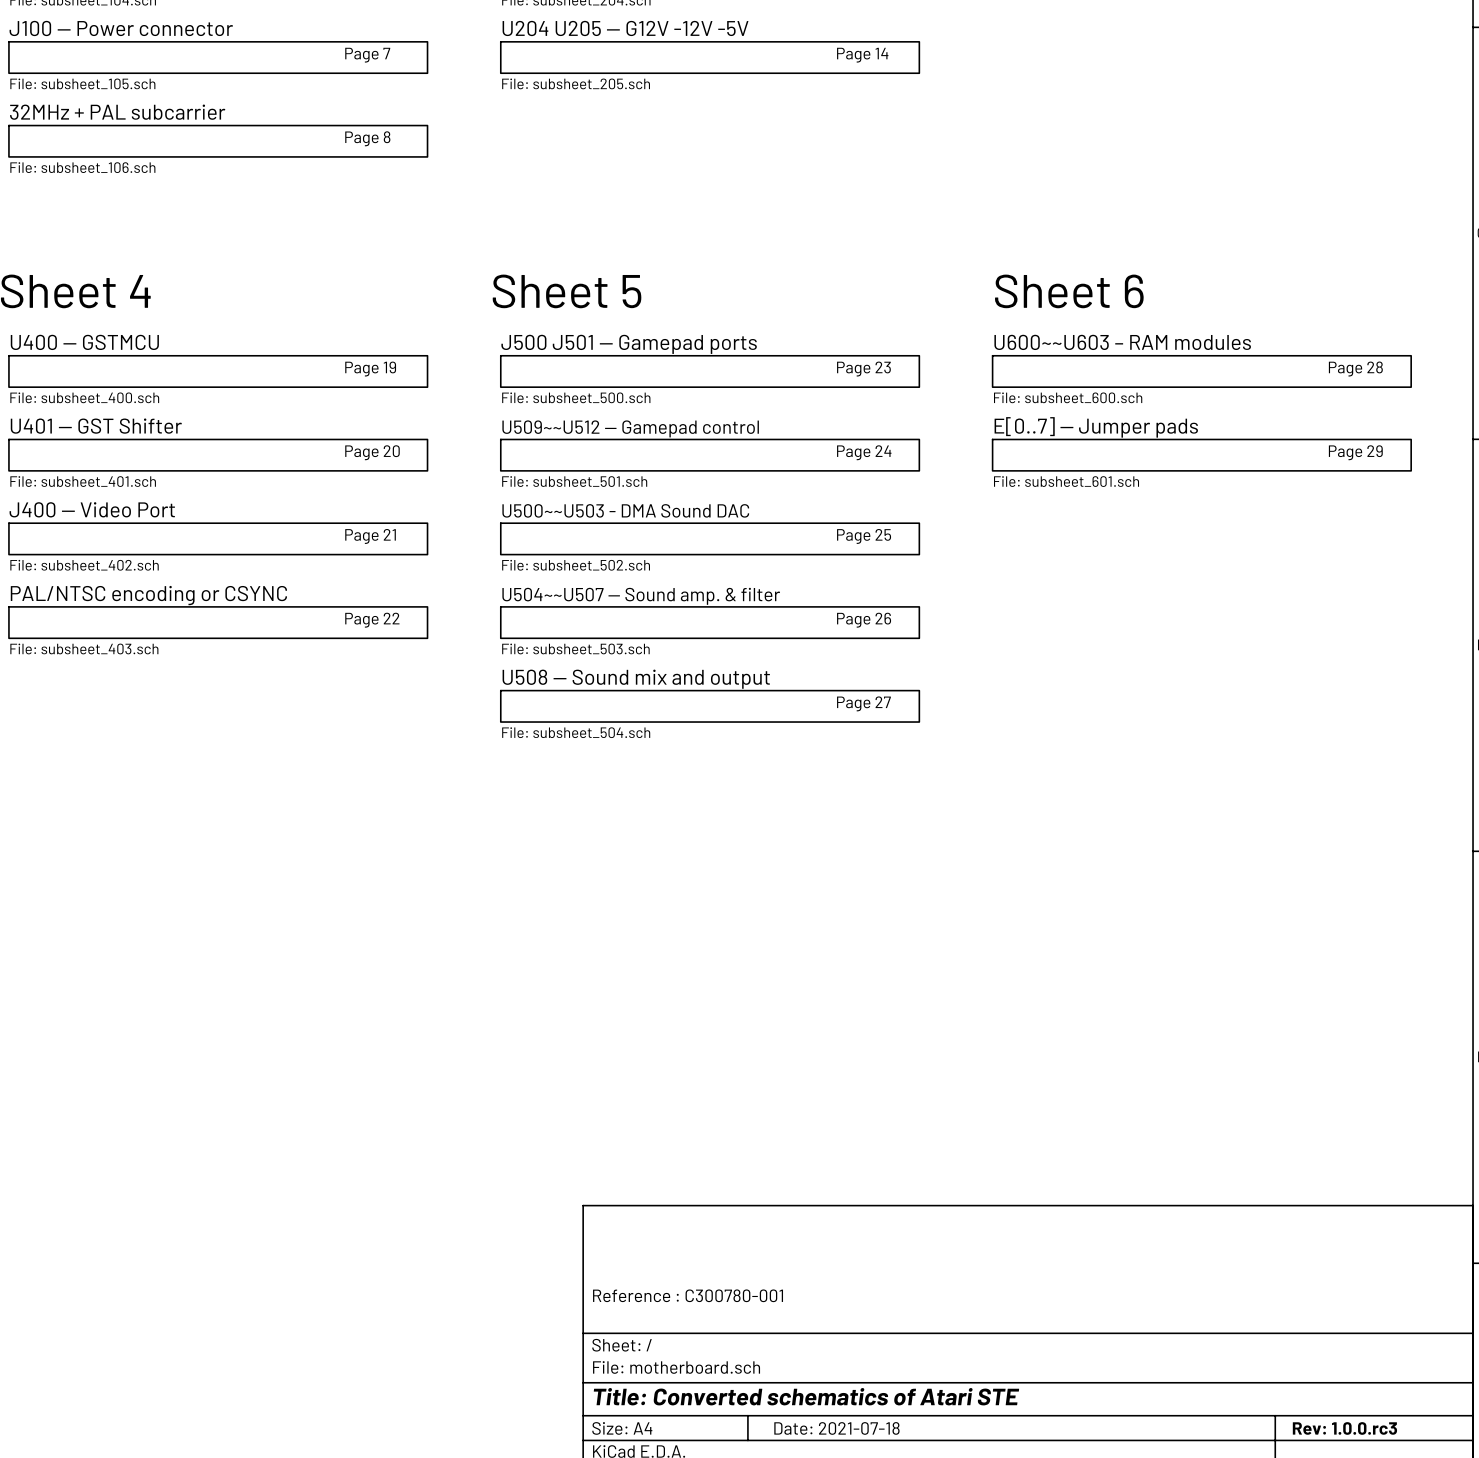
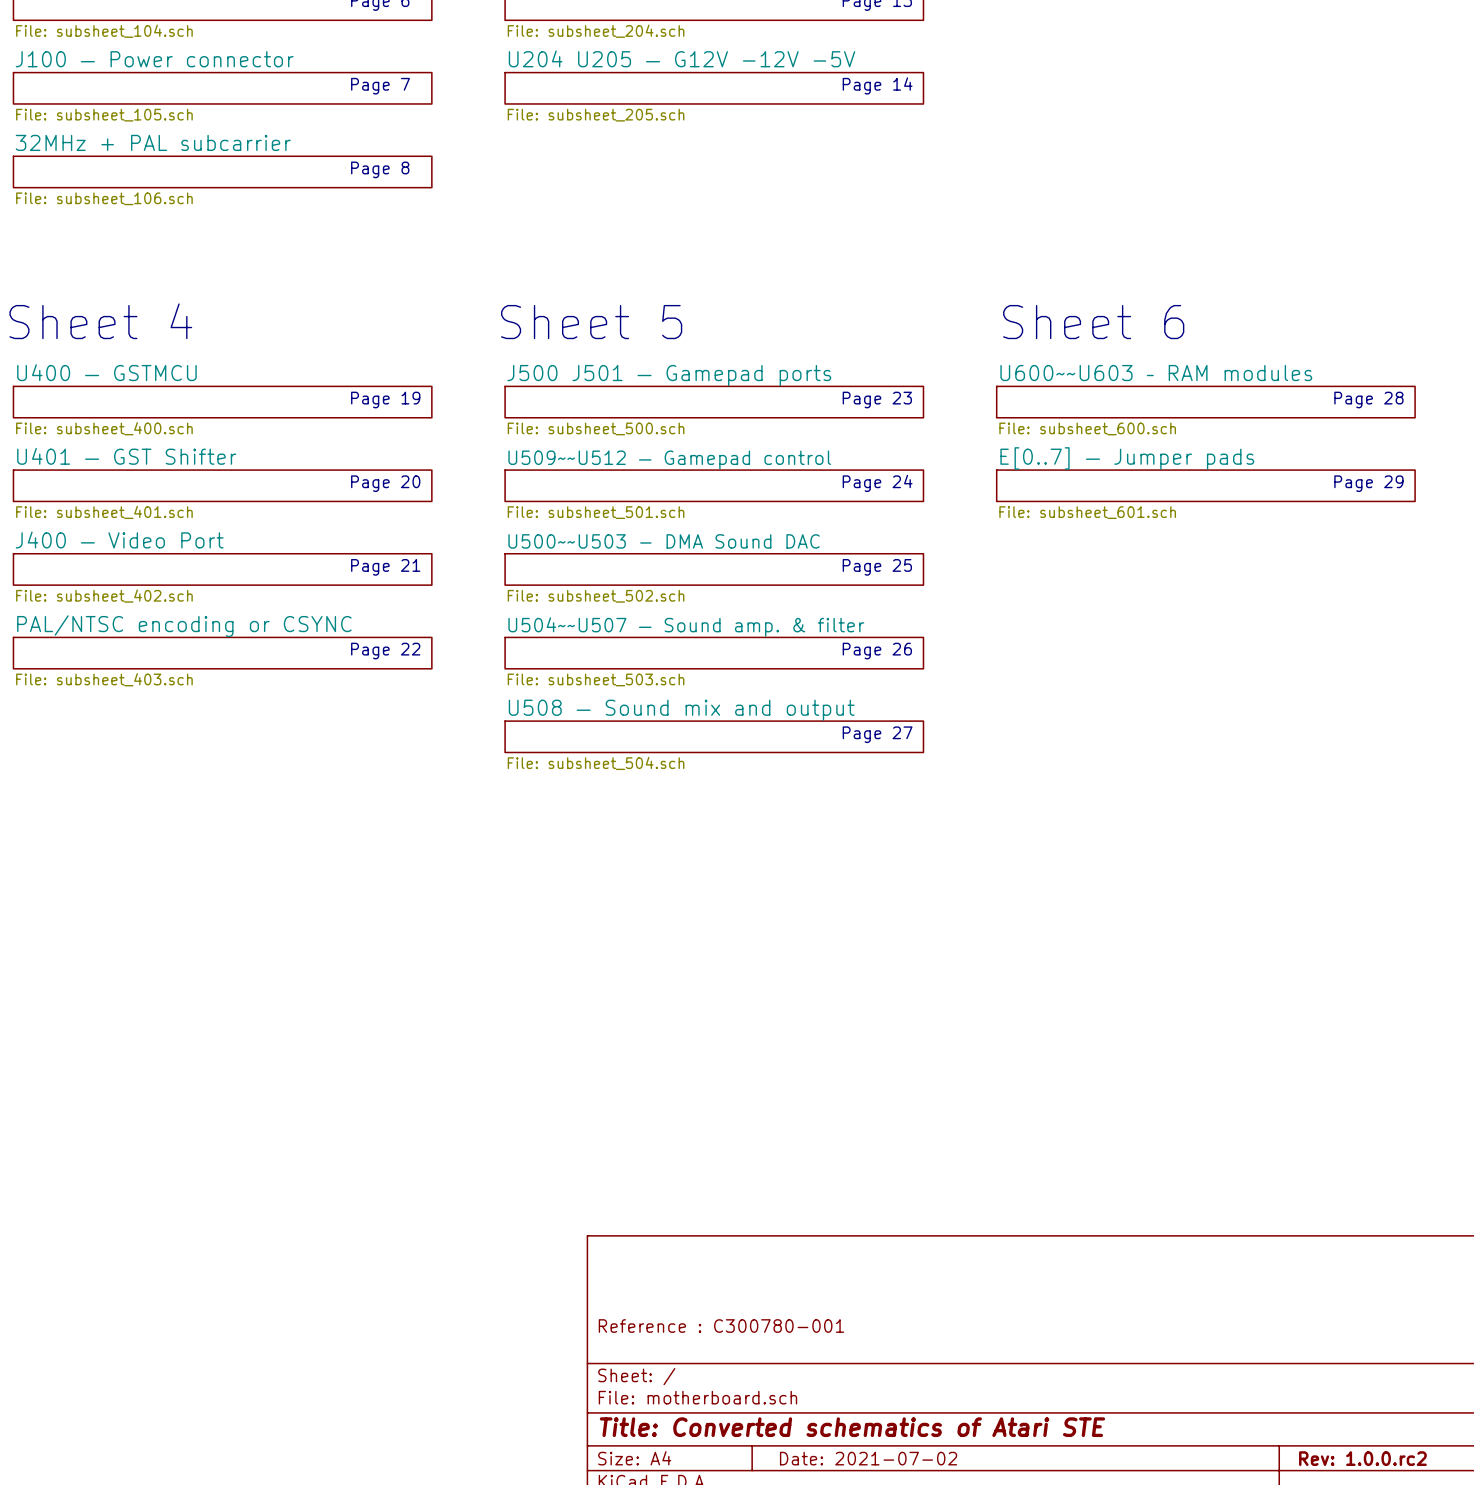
title block: Date: 2021-07-18 (836, 1428) -> Date: 2021-07-02 (868, 1458)
title block: Rev: 1.0.0.rc3 (1344, 1428) -> Rev: 1.0.0.rc2 (1362, 1458)

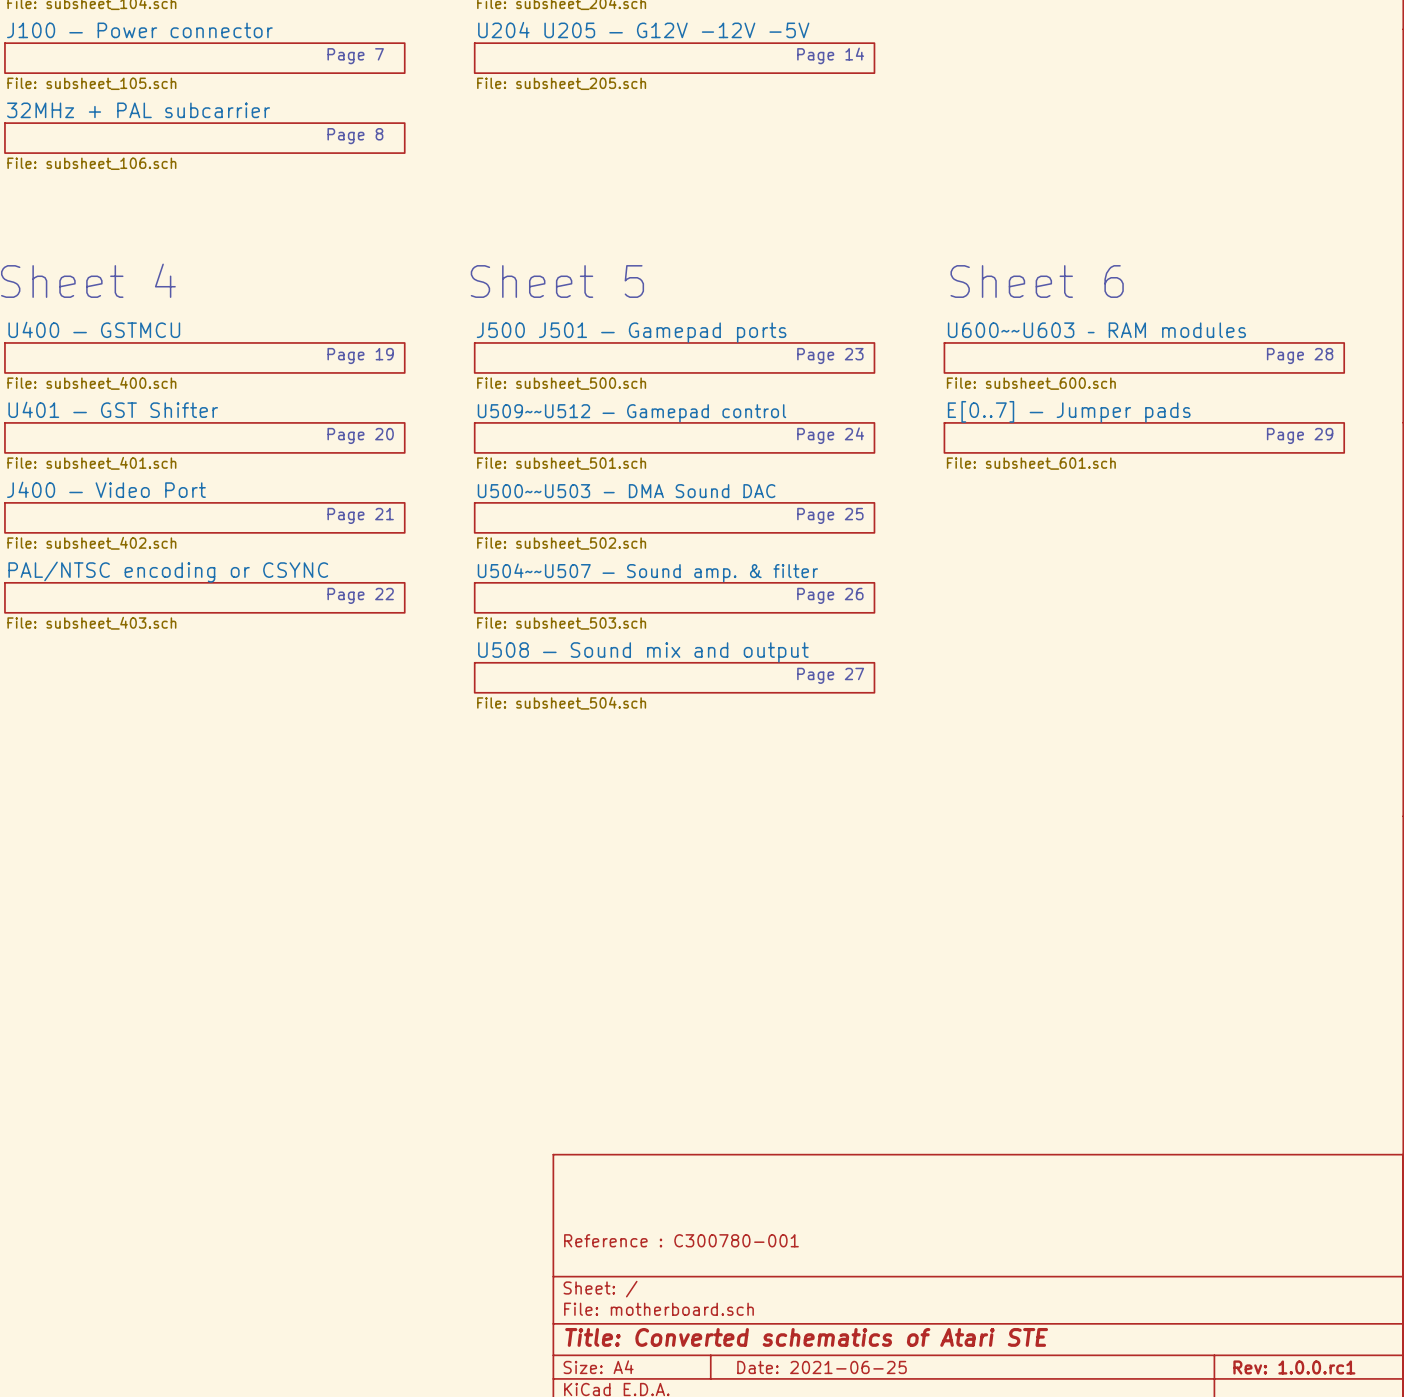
title block: Date: 2021-07-02 (868, 1458) -> Date: 2021-06-25 (822, 1367)
title block: Rev: 1.0.0.rc2 (1362, 1458) -> Rev: 1.0.0.rc1 (1294, 1367)

